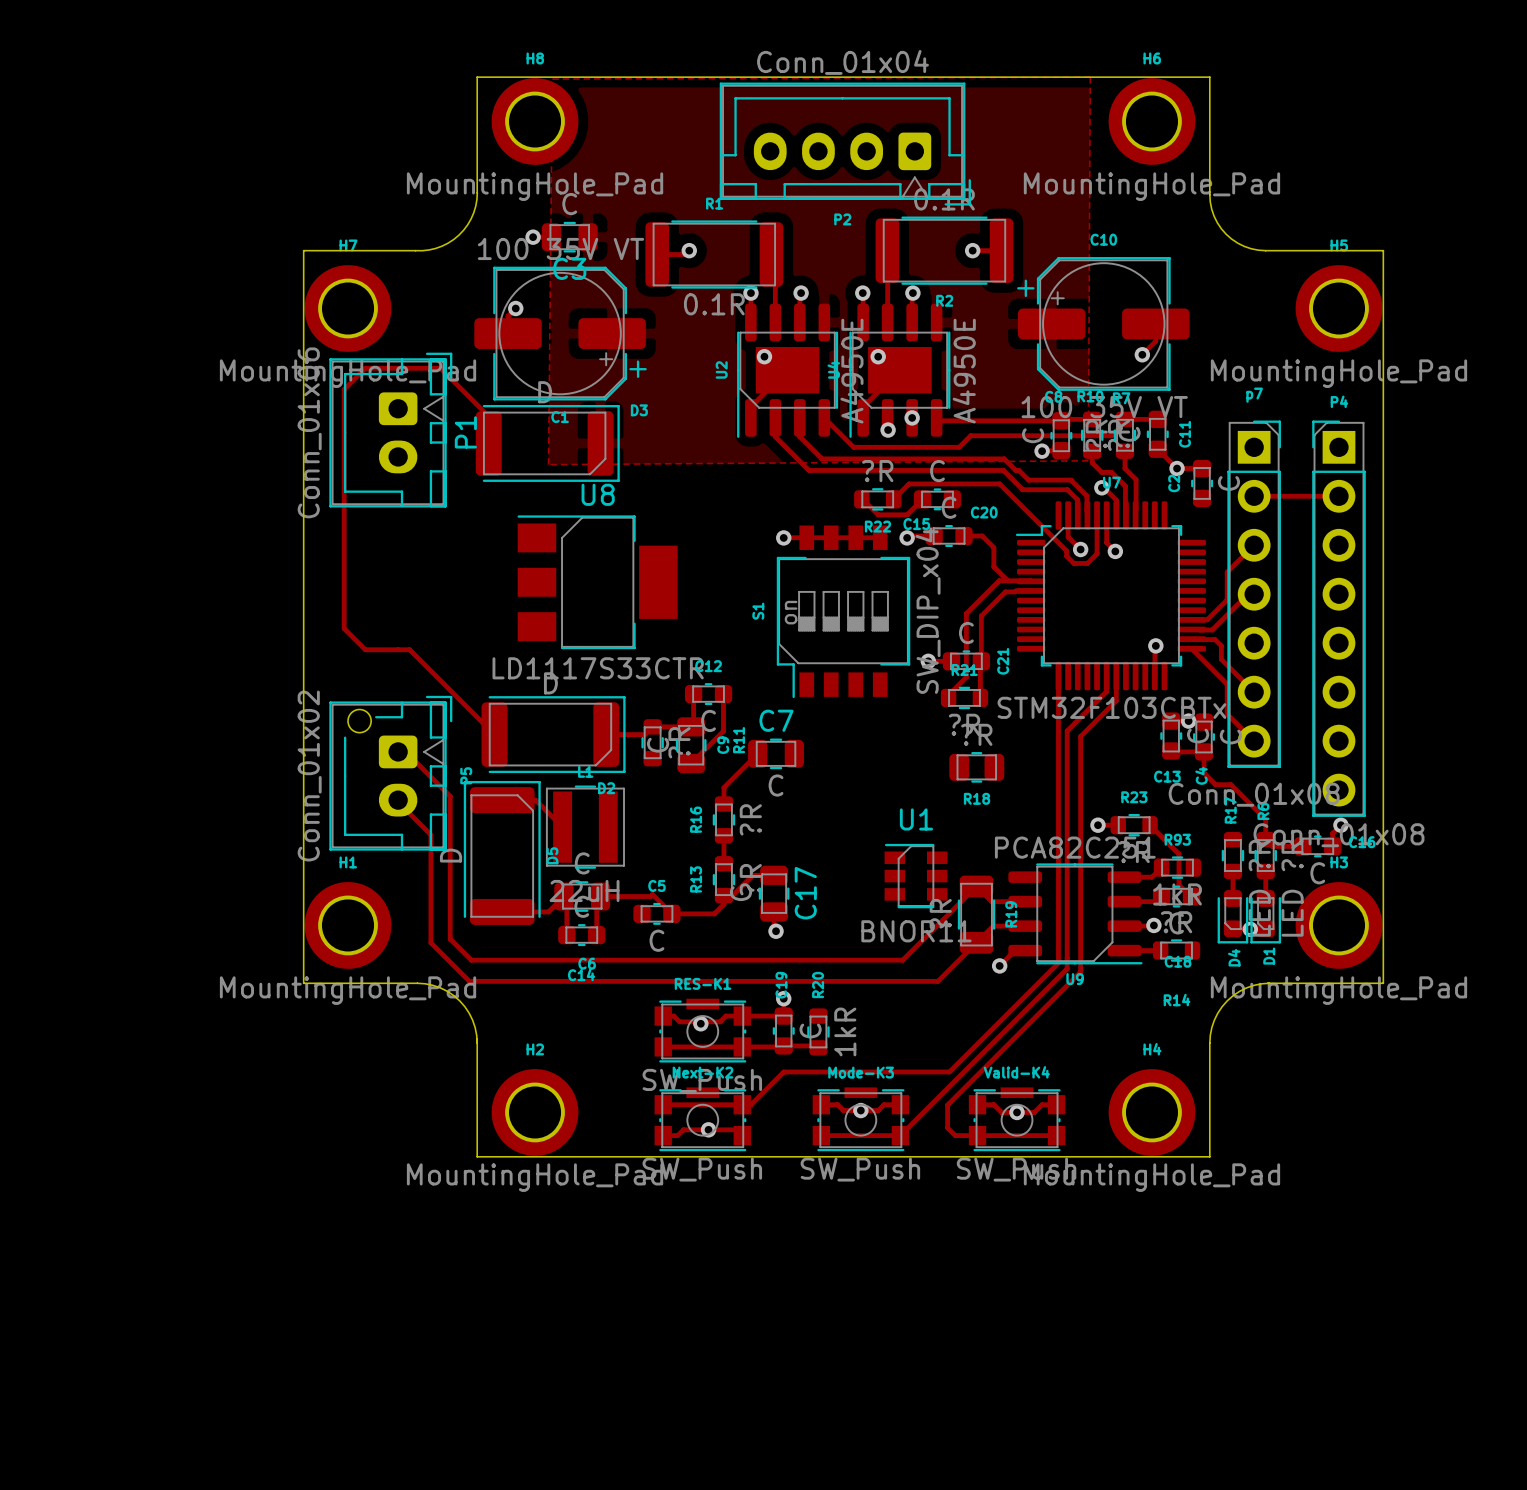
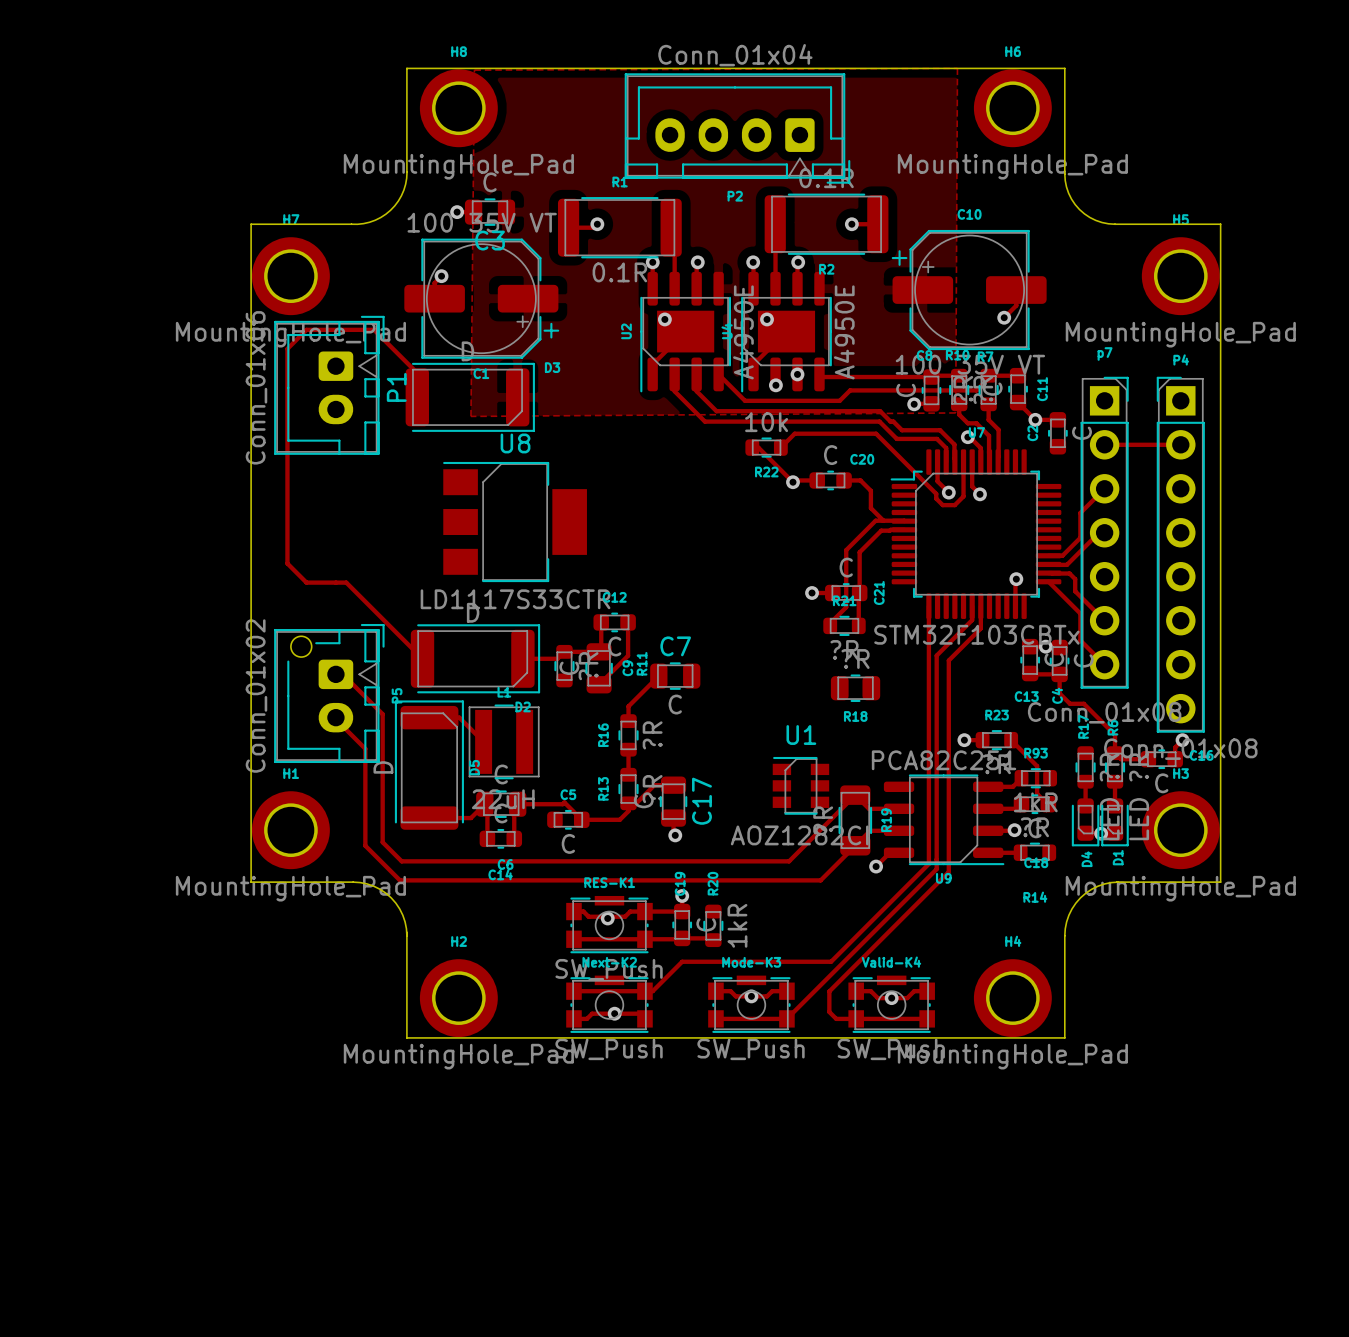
R22 value: ?R (877, 471) -> 10k (766, 422)
track: (862, 499) (878, 514) (907, 514) (922, 499) -> (753, 447) (758, 447) (792, 482)
C15: C (937, 499) -> none
track: (783, 537) (880, 537) -> none
via: (783, 537) -> none
S1: SW_DIP_x04 (843, 611) -> none
U1 value: BNOR11 (916, 931) -> AOZ1282CI (799, 835)

